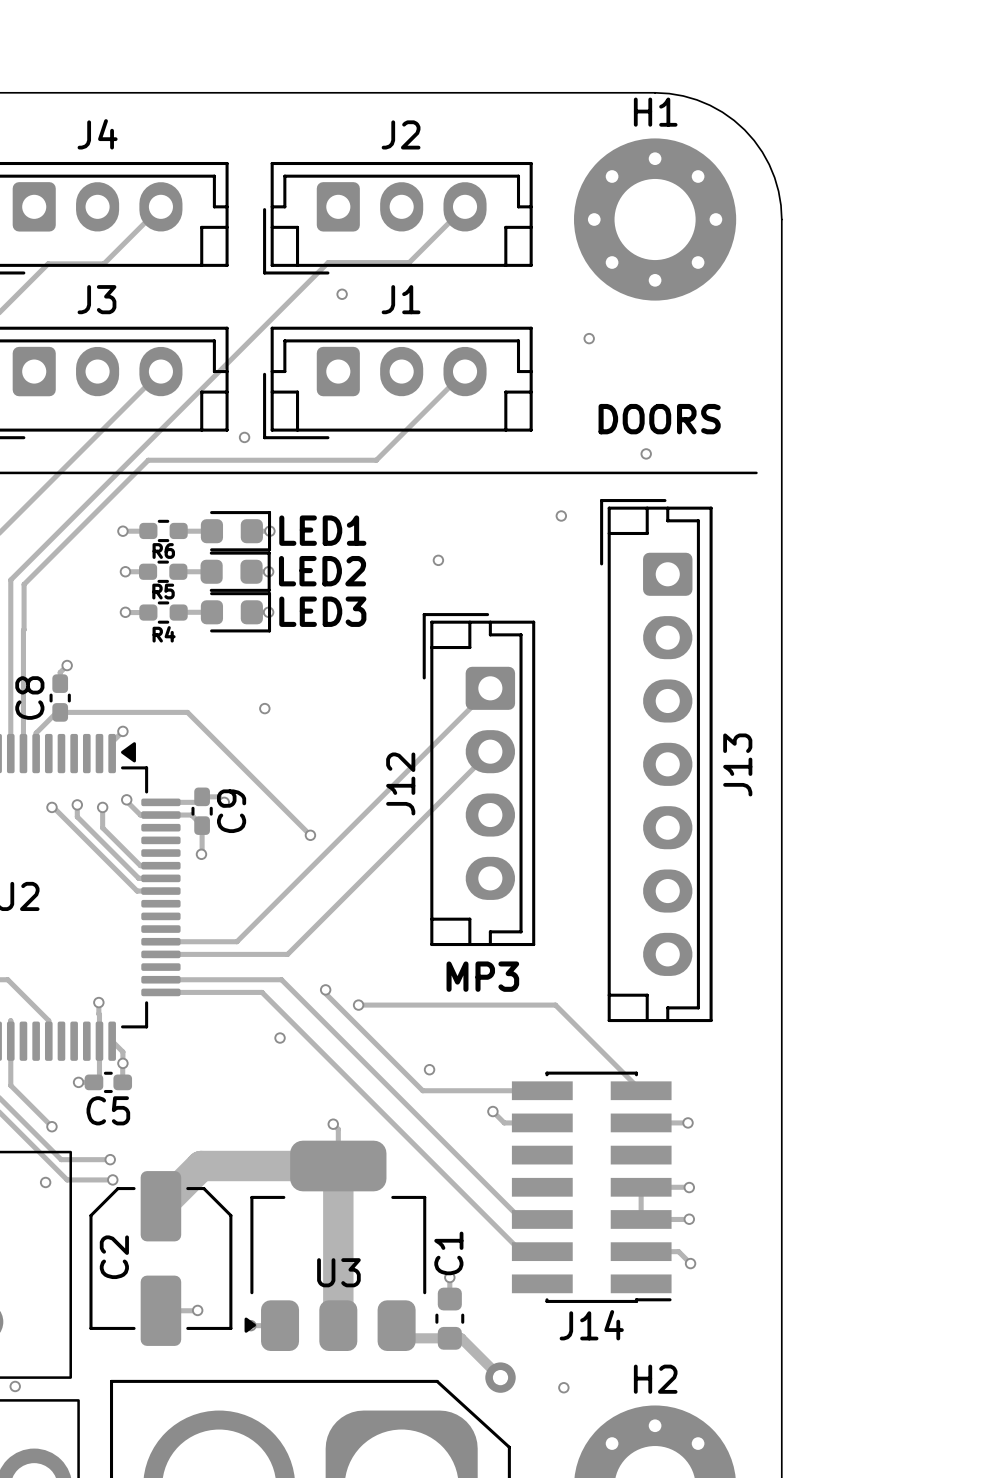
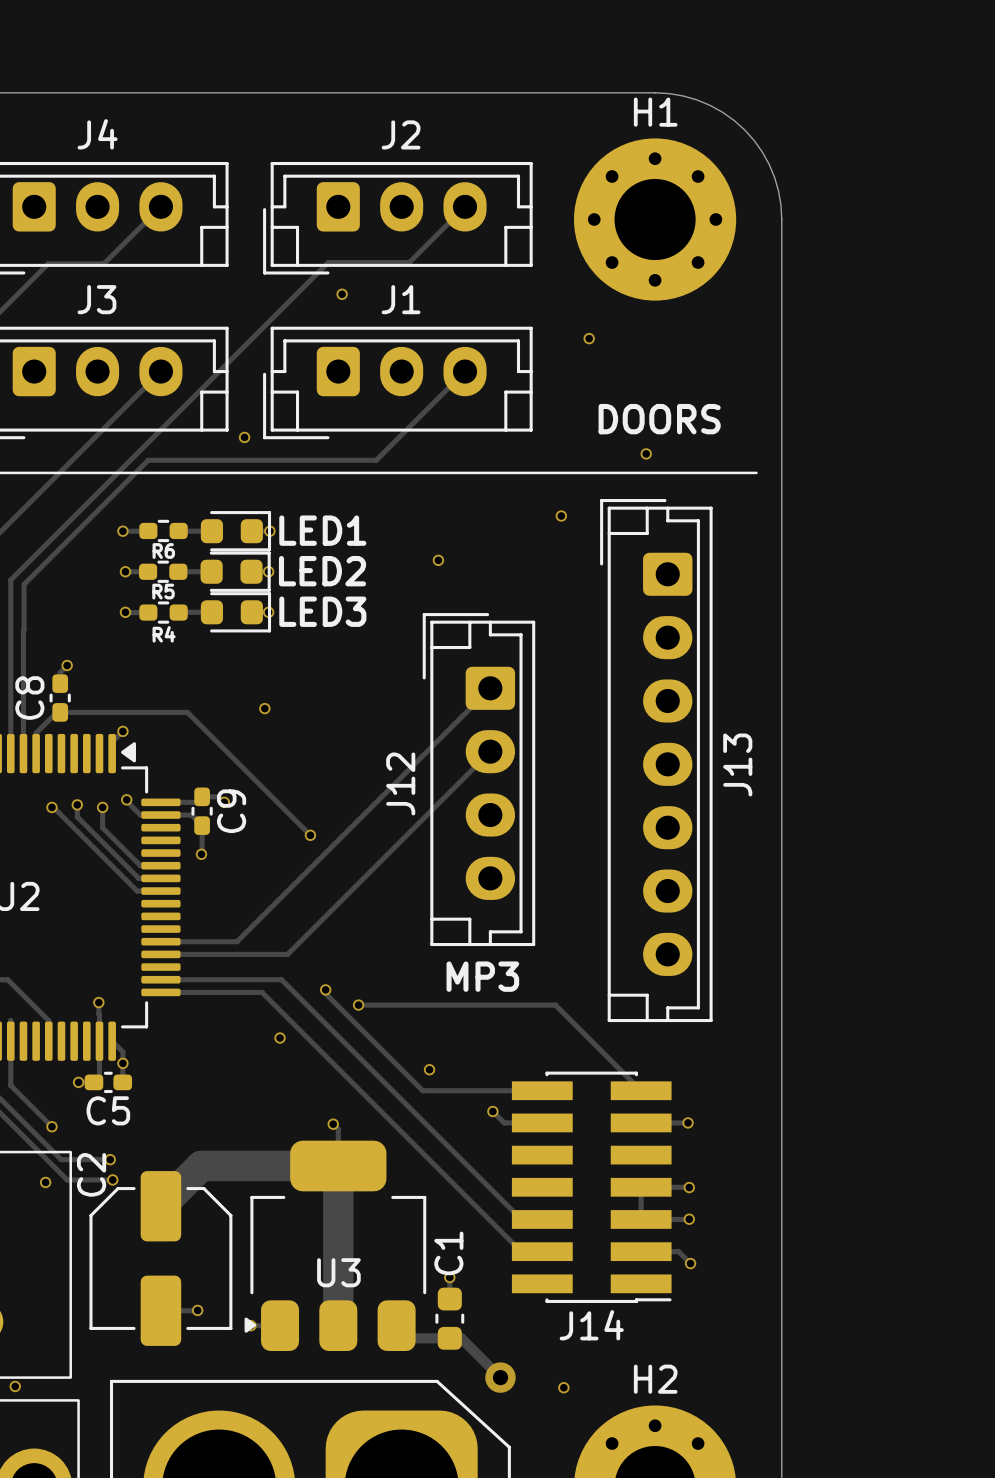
C2 name position: C2 (114, 1257) -> C2 (91, 1174)

